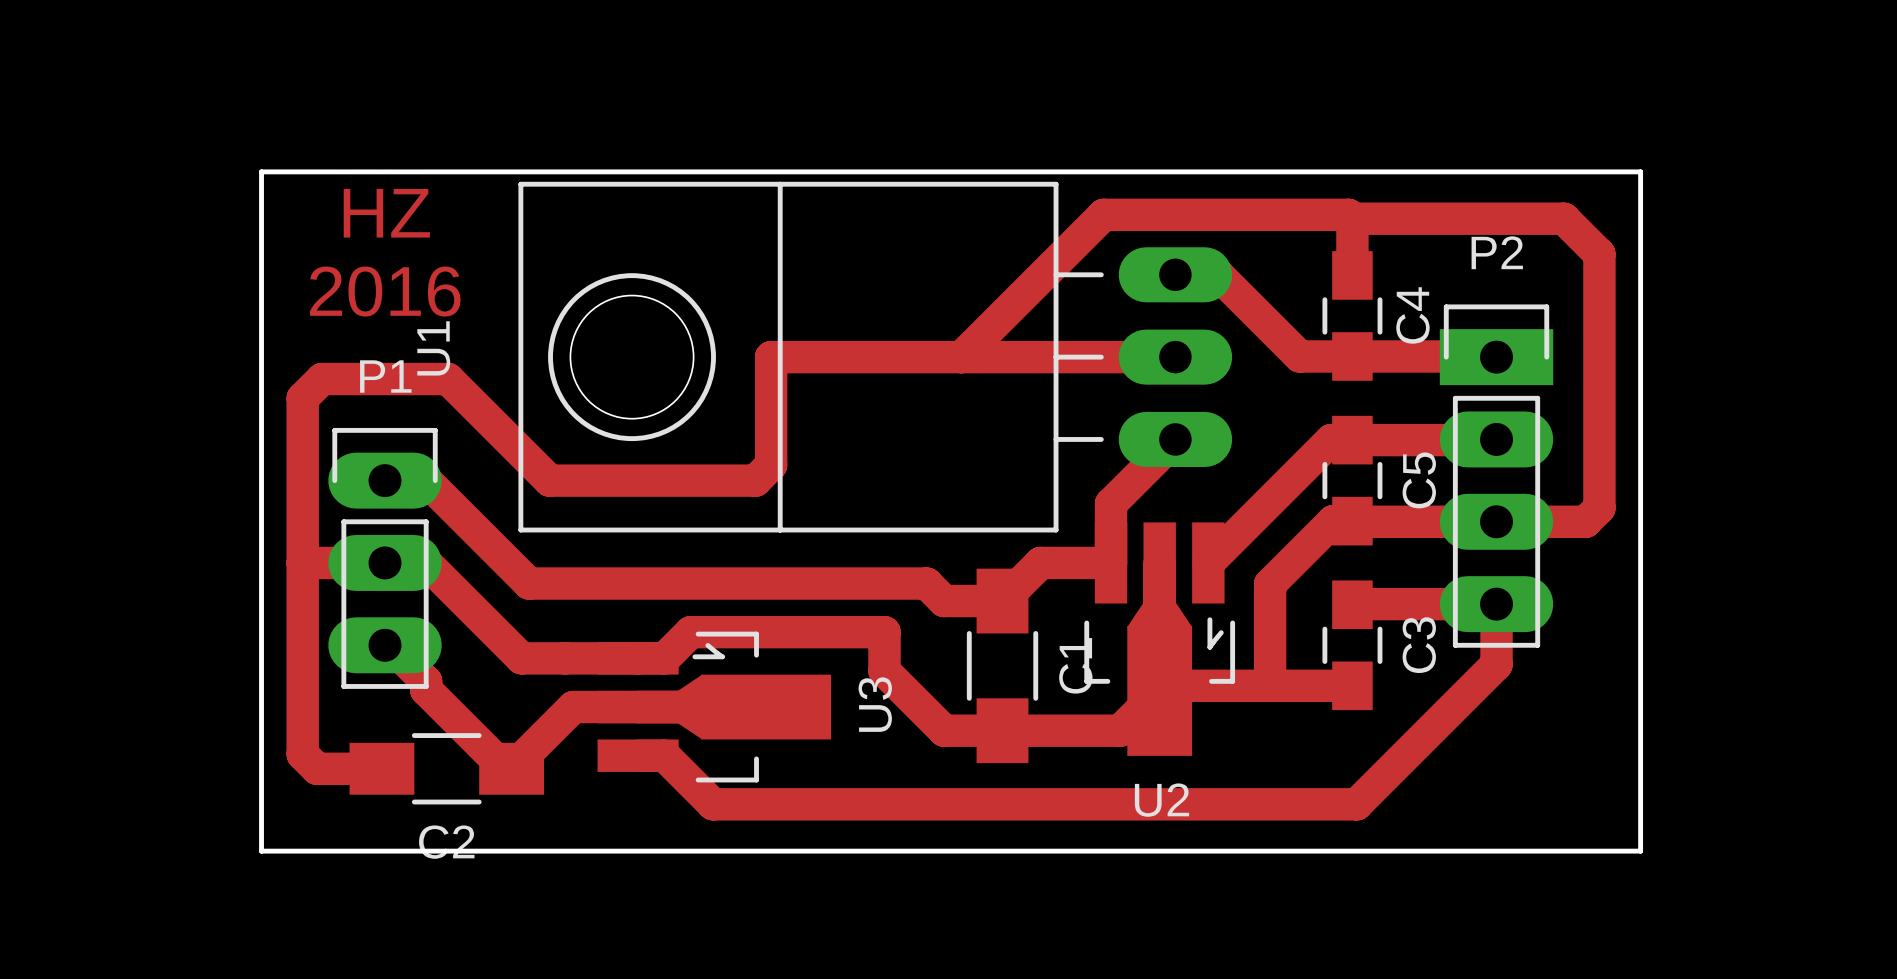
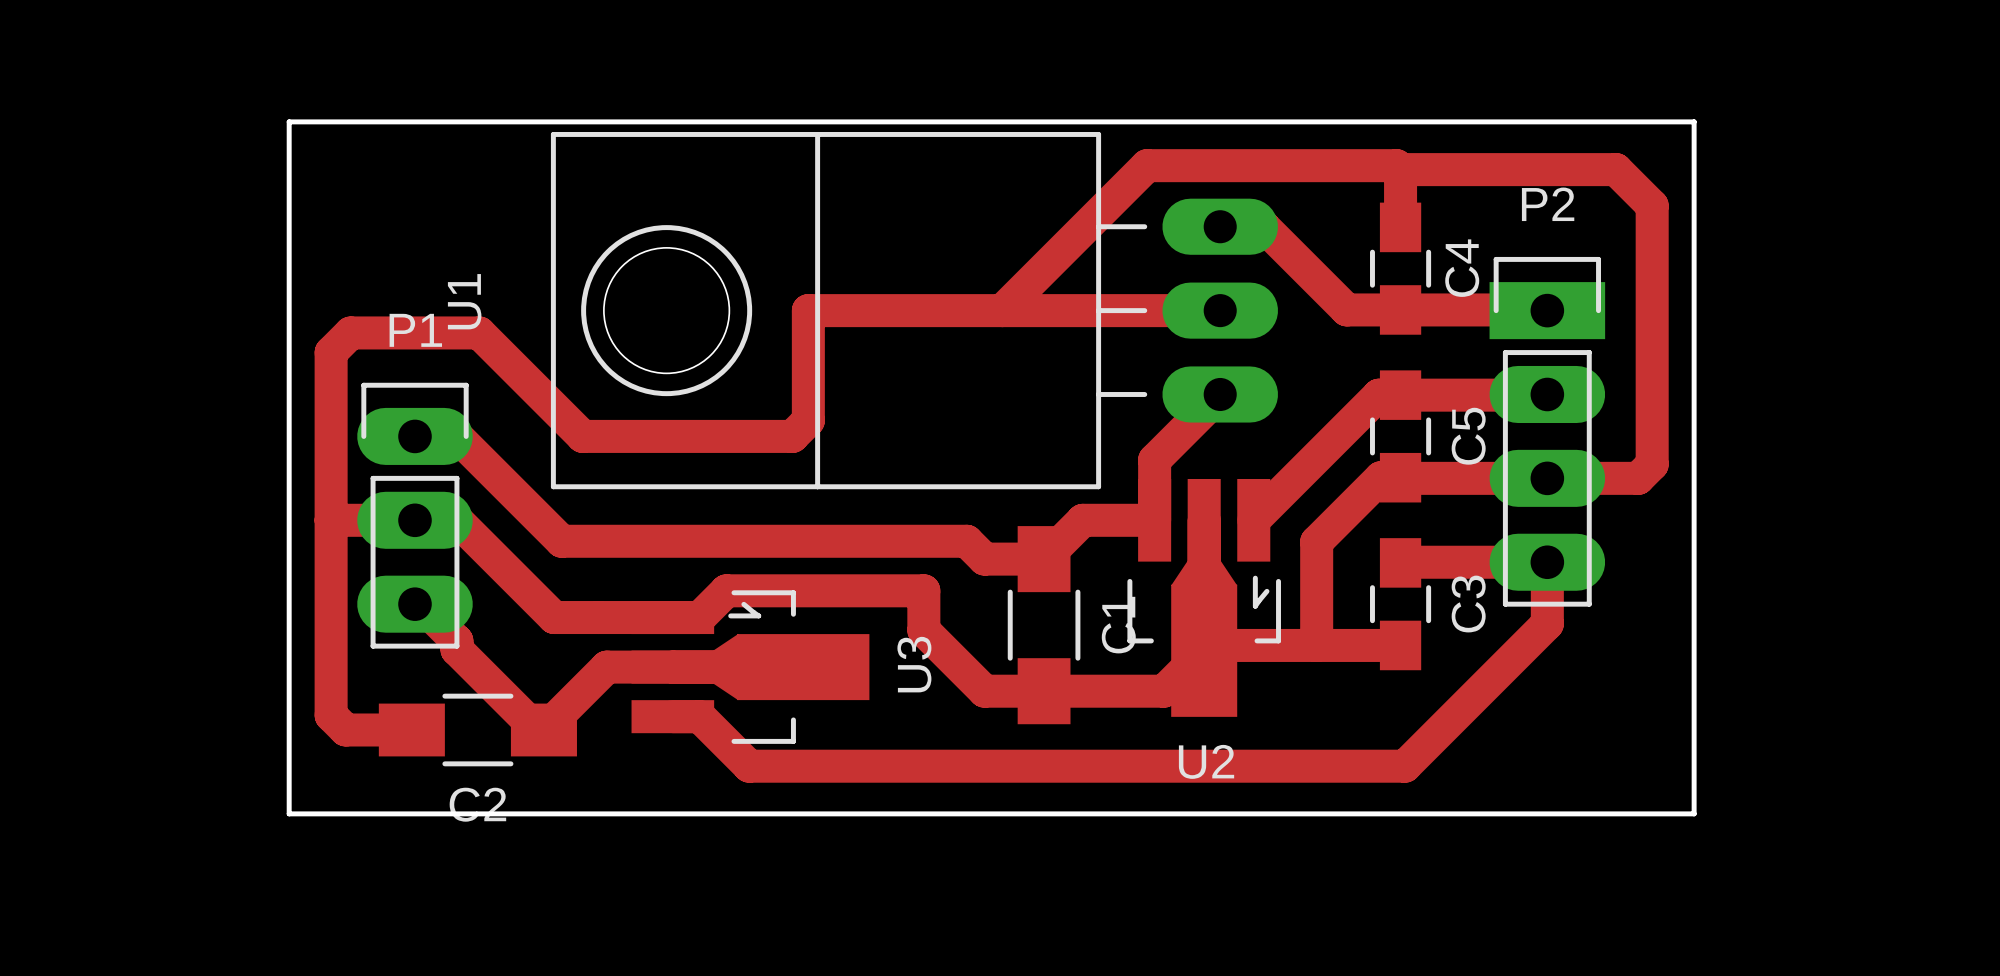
text: HZ (386, 213) -> none
text: 2016 (385, 291) -> none

